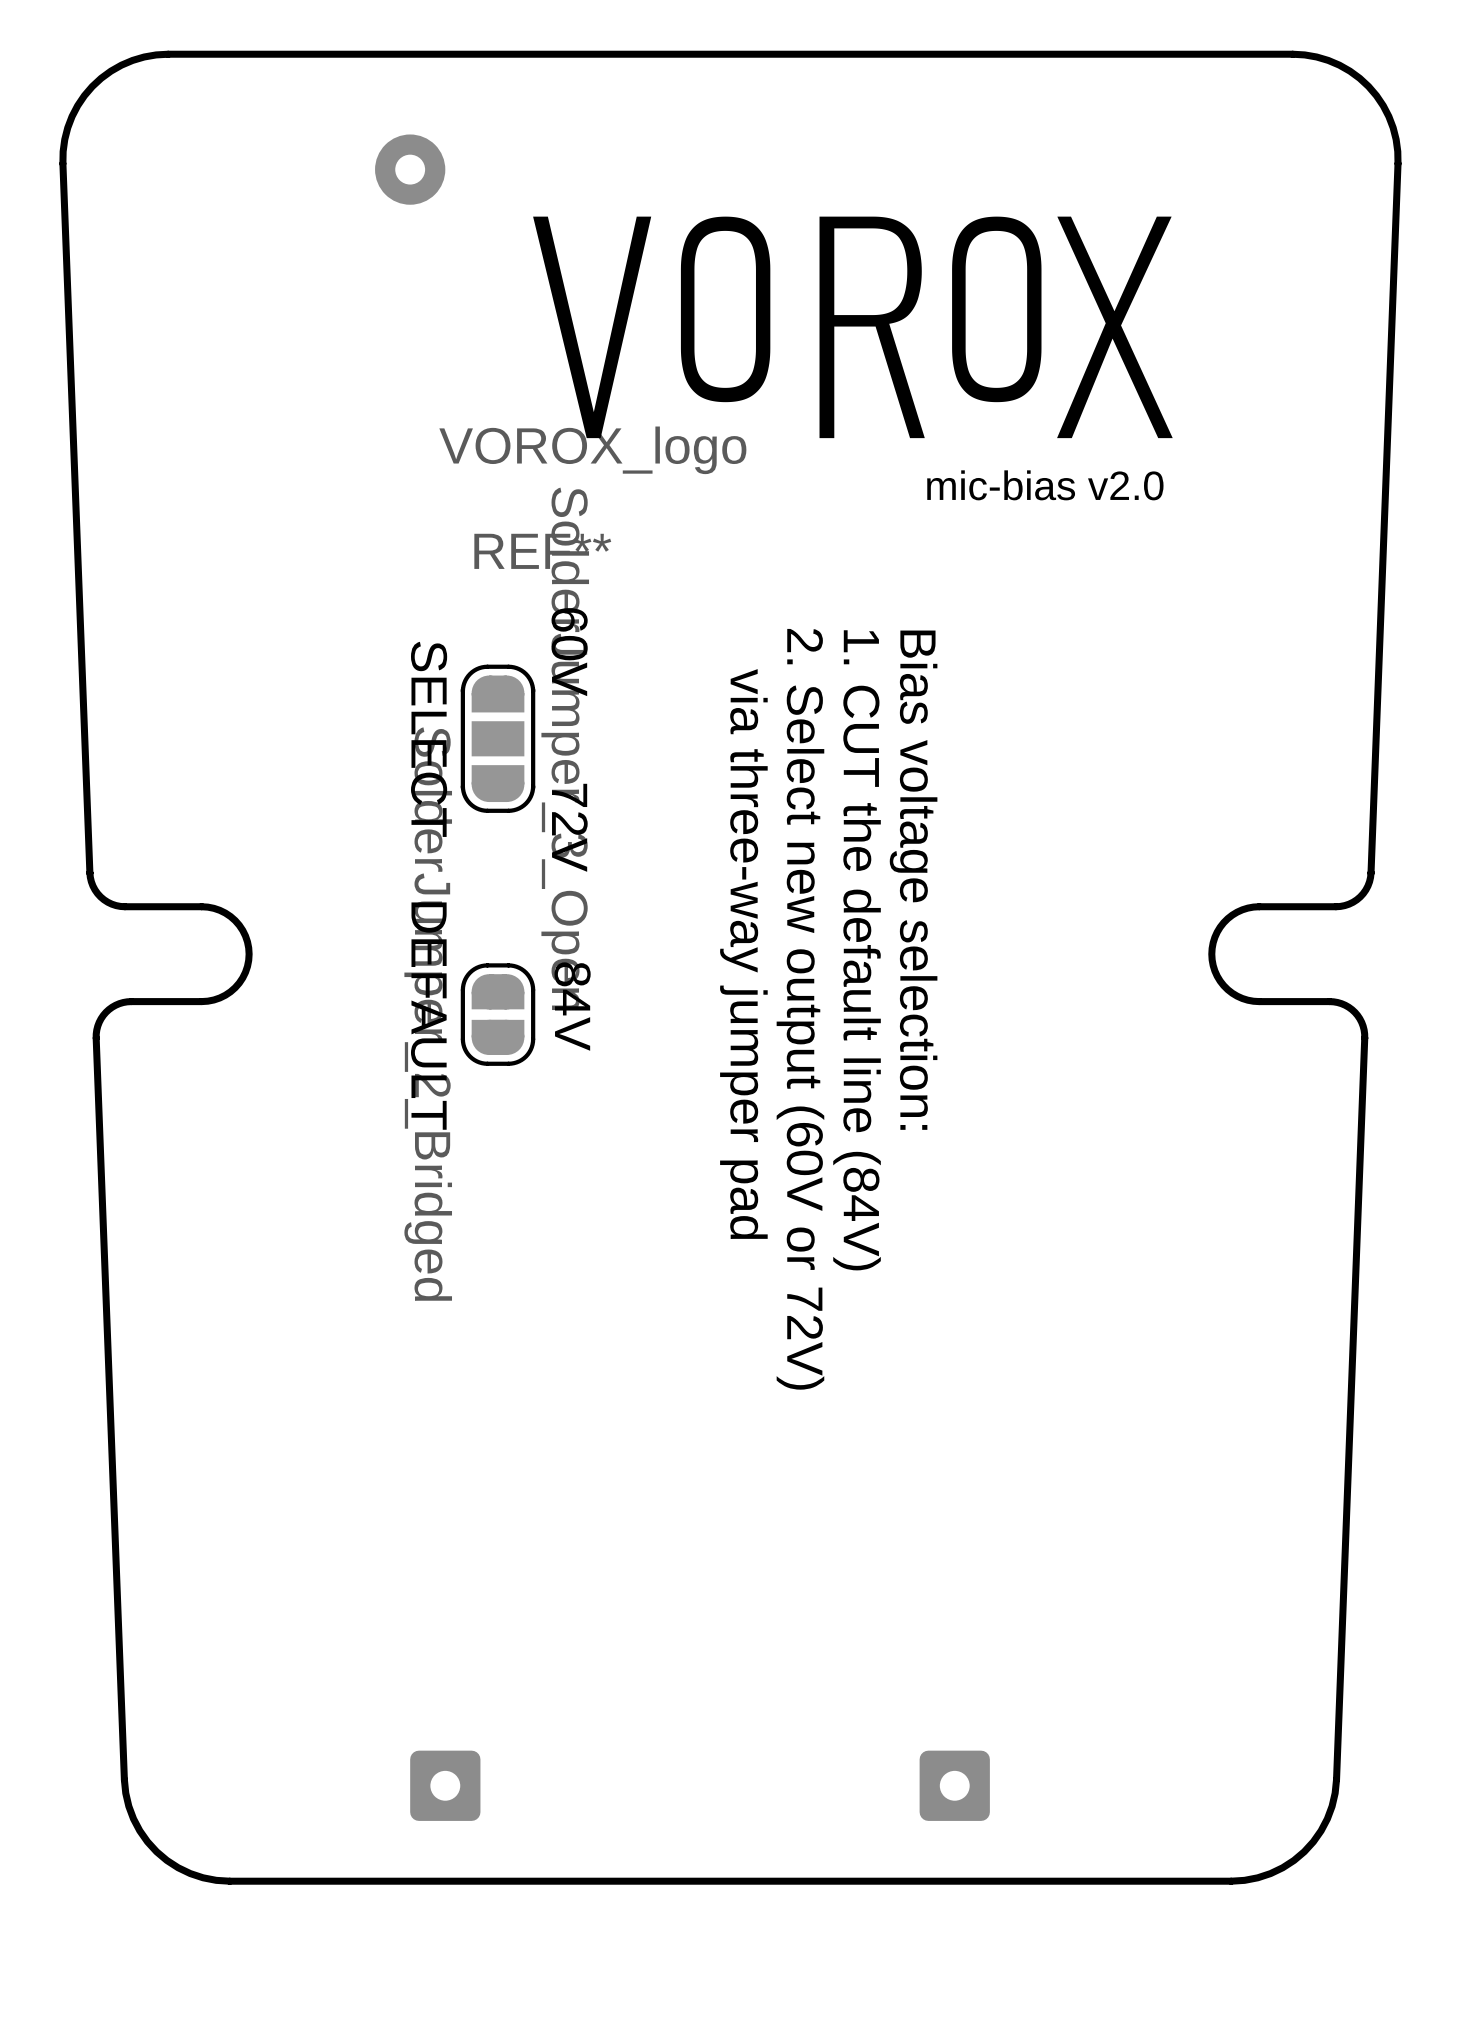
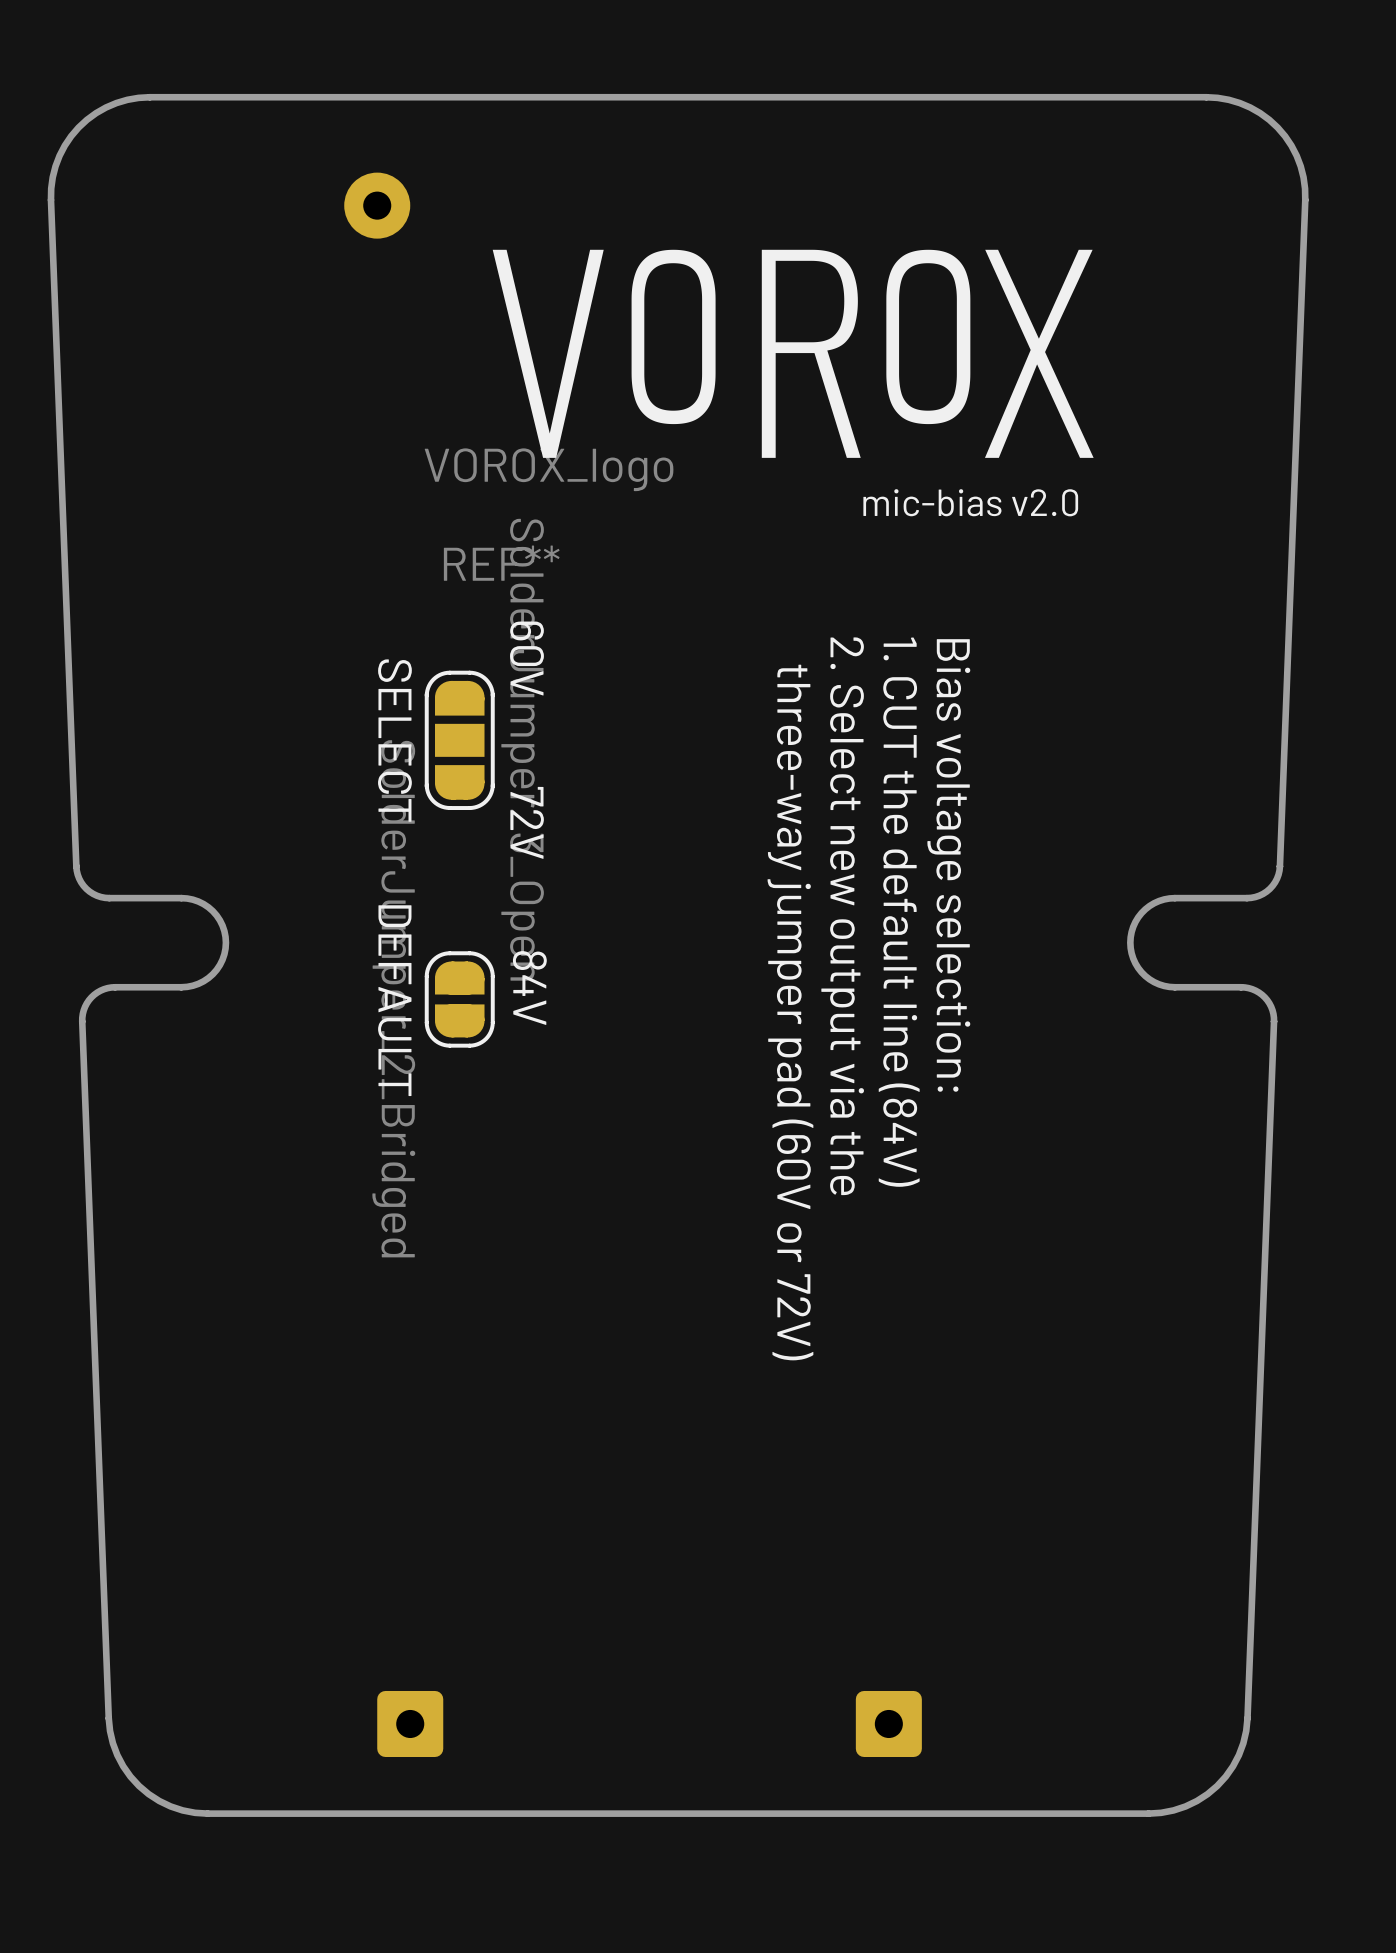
text: Bias voltage selection: (913, 880) -> 2. Select new output via the (842, 916)
text: none -> Bias voltage selection: (948, 865)
text: 1. CUT the default line (84V) (857, 950) -> three-way jumper pad (60V or 72V) (790, 1012)
text: none -> 1. CUT the default line (84V) (899, 912)
text: via three-way jumper pad (743, 954) -> none
text: 2. Select new output (60V or 72V) (800, 1009) -> none

